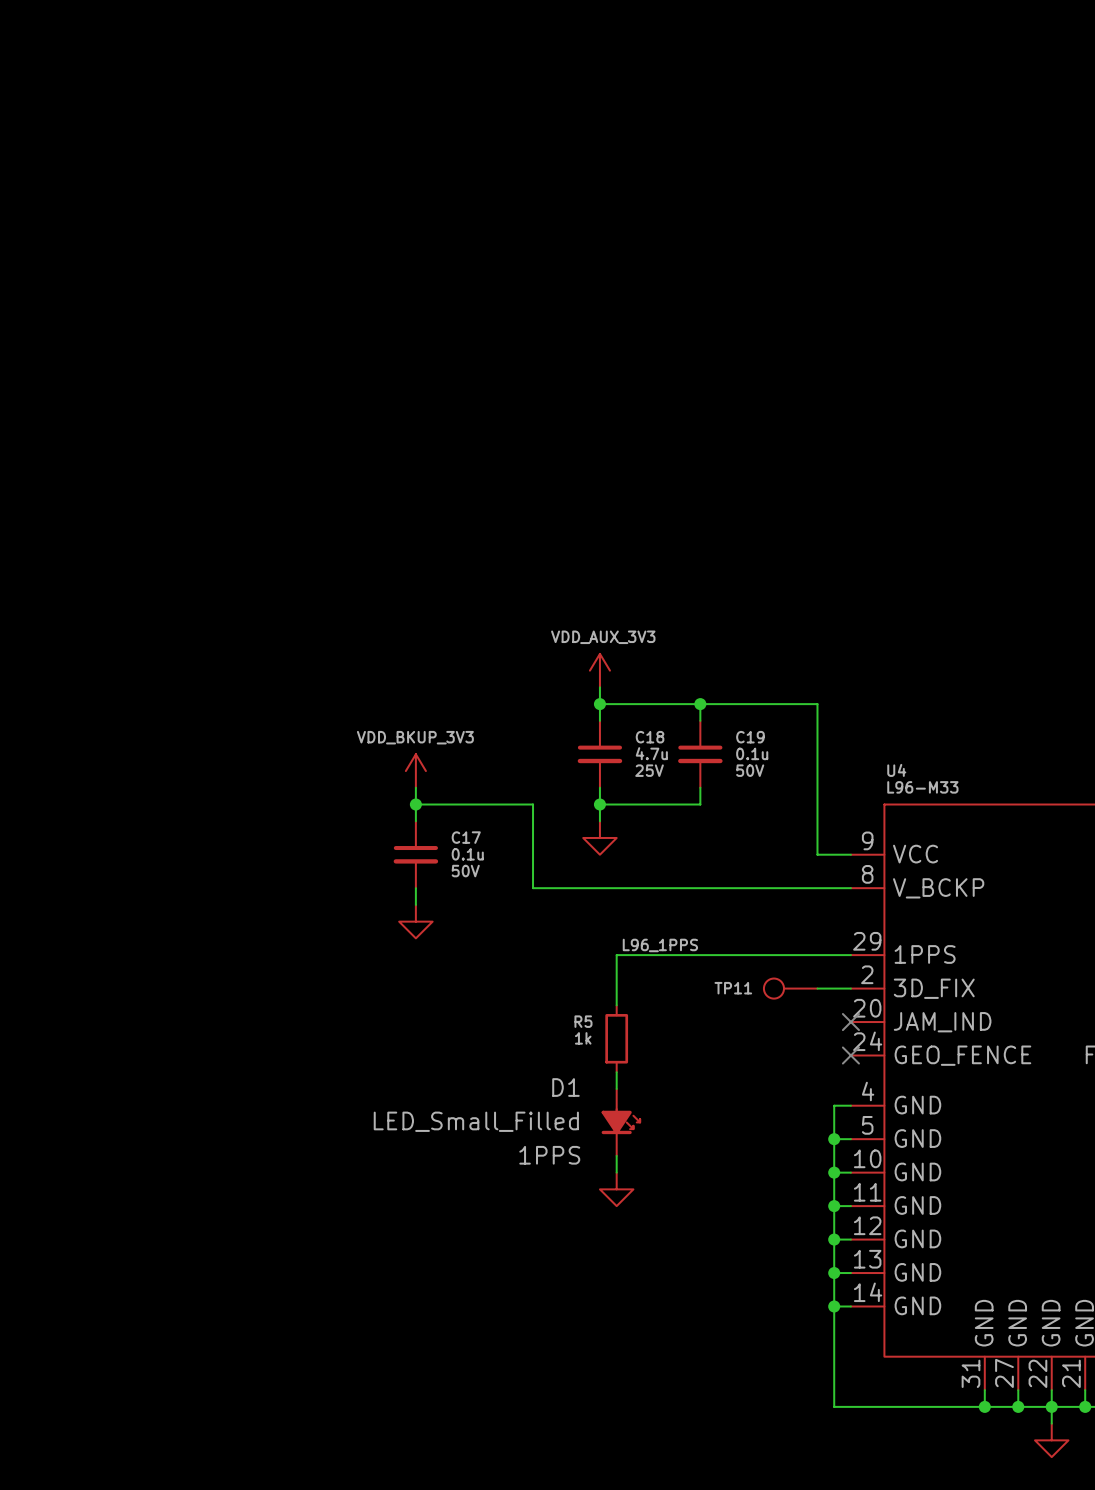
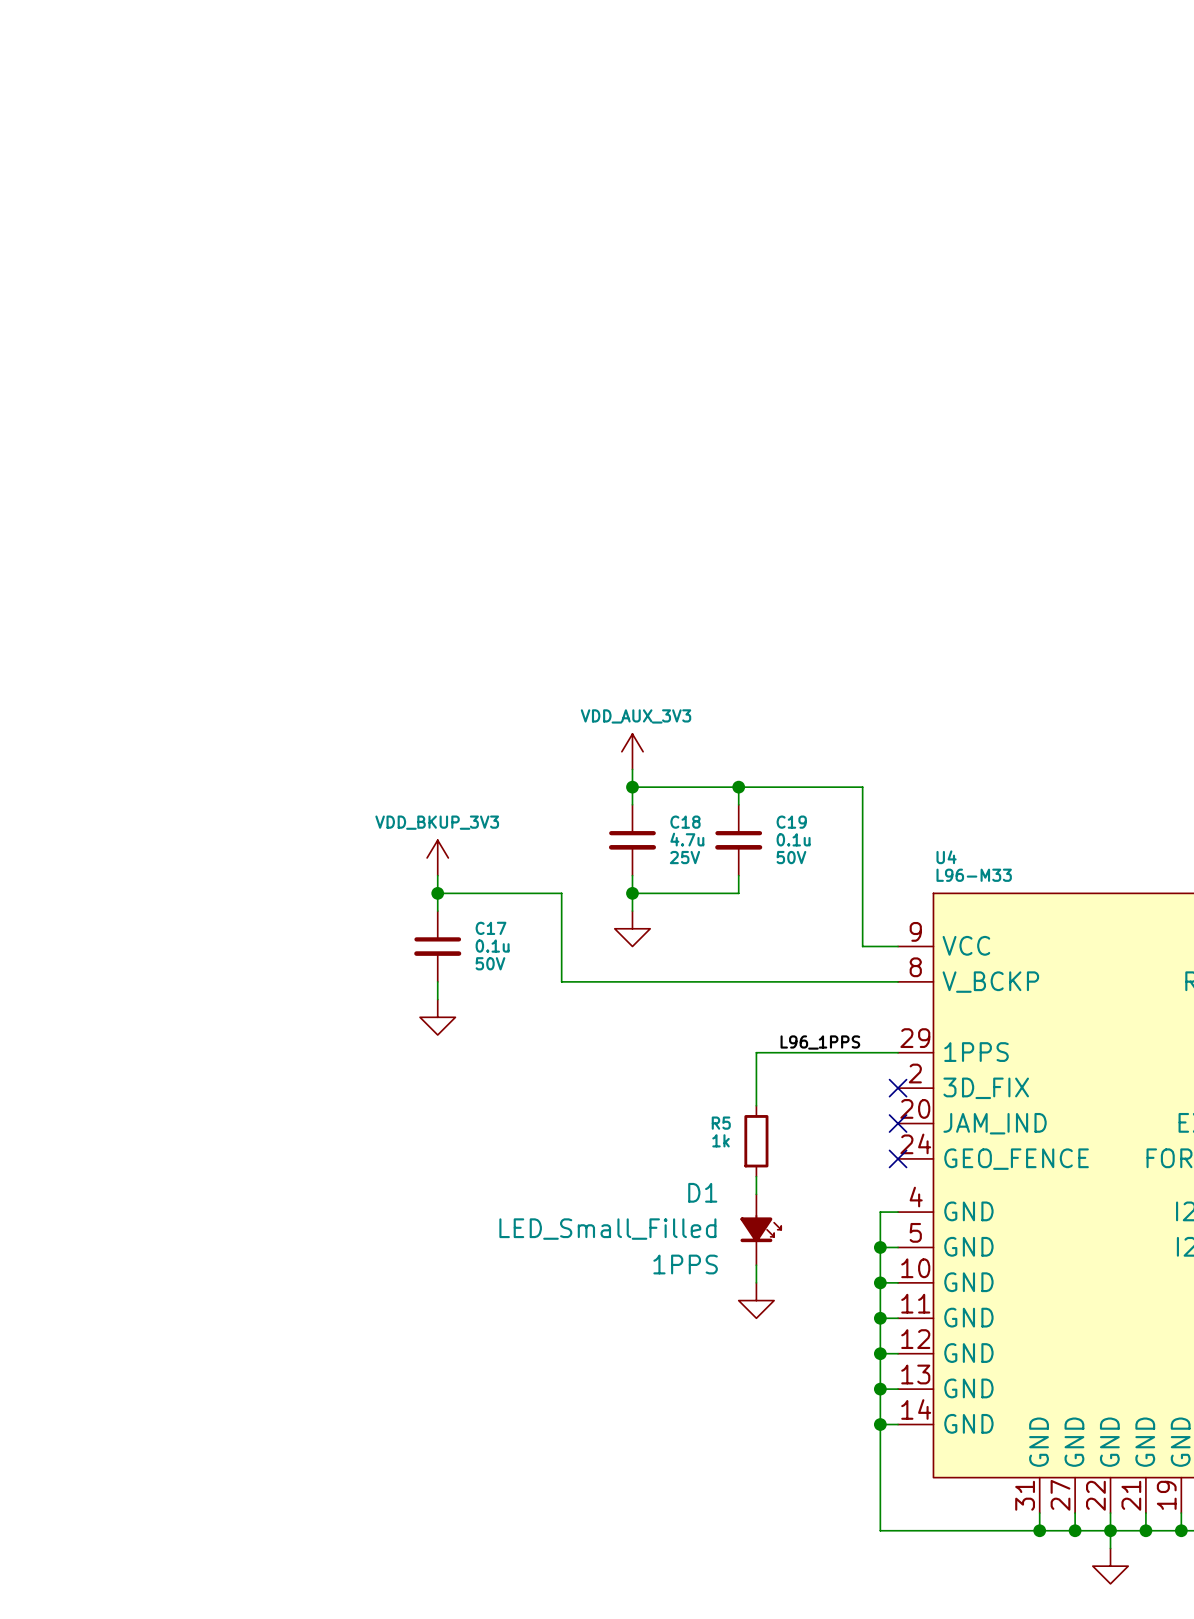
label position: L96_1PPS (660, 945) -> L96_1PPS (820, 1042)
wire: (717, 955) (616, 955) (616, 1005) -> (756, 1052) (756, 1105)
TP11: (790, 988) -> none
wire: (817, 988) (850, 988) -> none
no-connect mark: none -> (898, 1088)
R5 position: (616, 1038) -> (756, 1141)
wire: (616, 1072) (616, 1088) -> (756, 1176) (756, 1194)
D1 position: (620, 1122) -> (760, 1229)
wire: (616, 1155) (616, 1172) -> (756, 1265) (756, 1282)
power symbol position: (616, 1189) -> (756, 1300)

